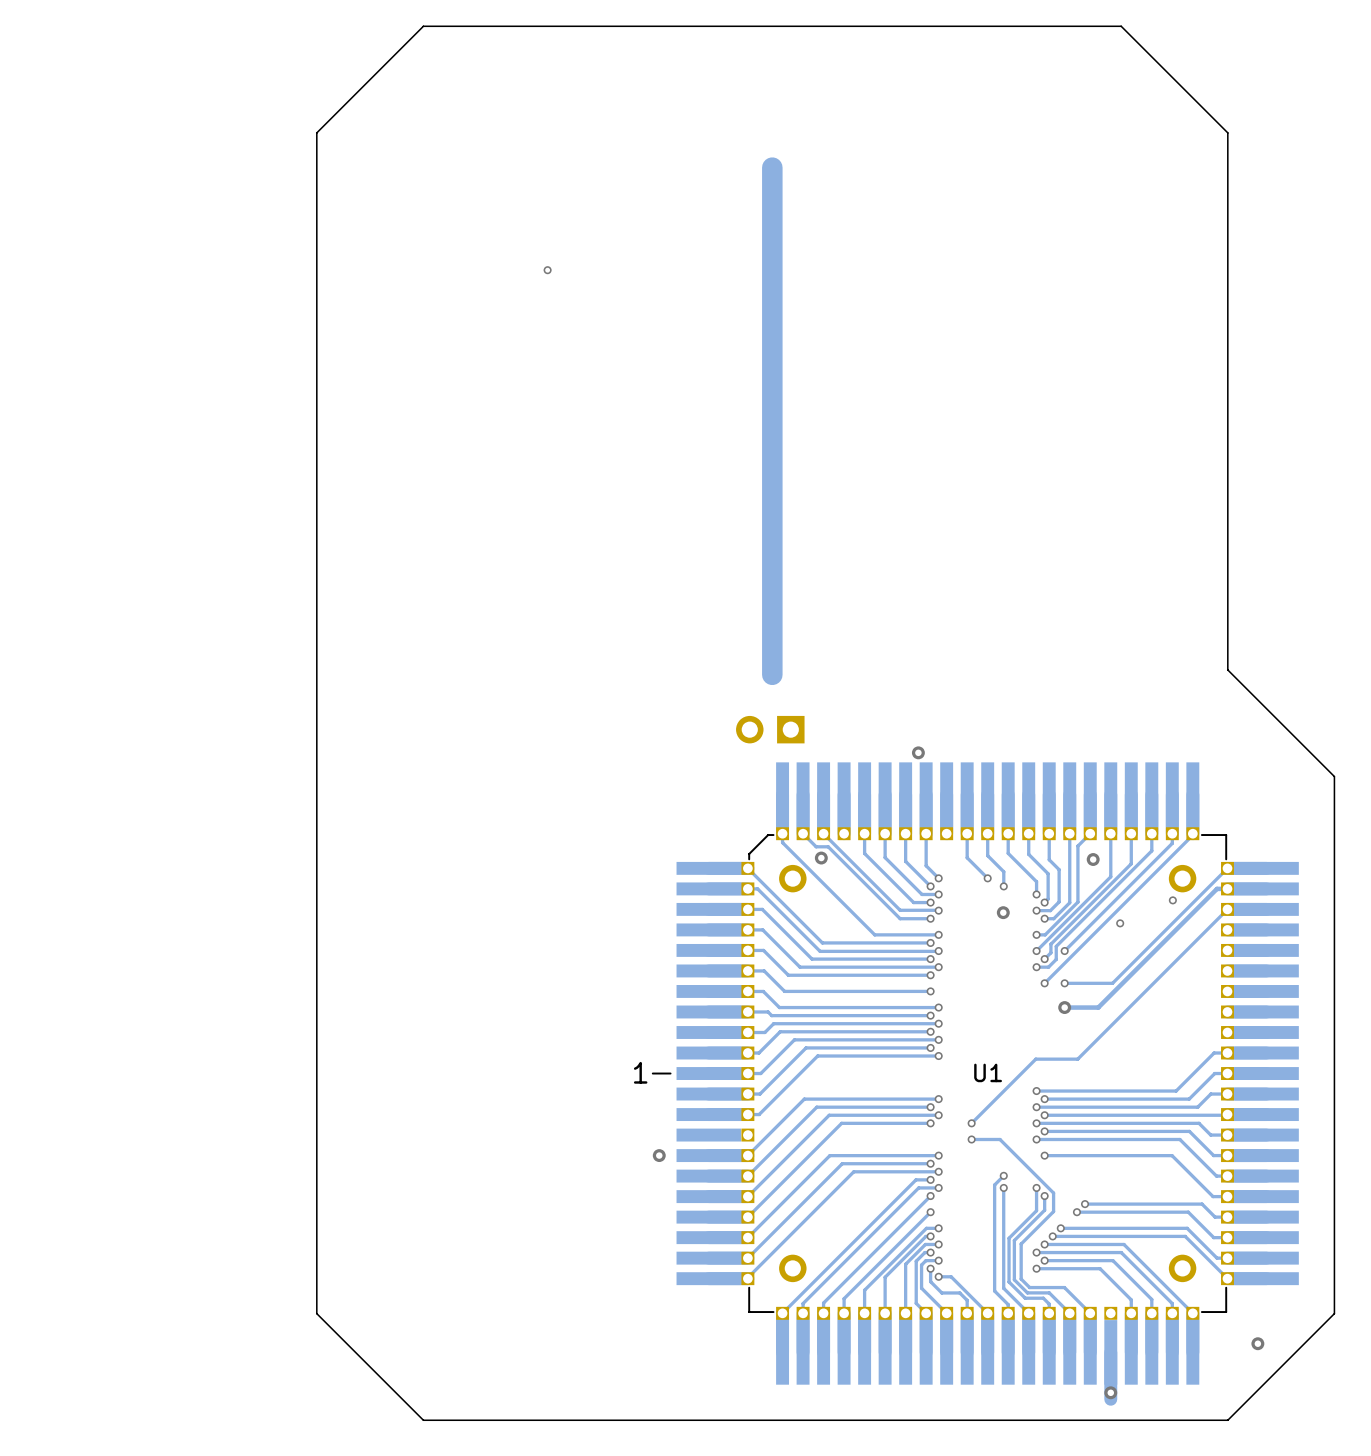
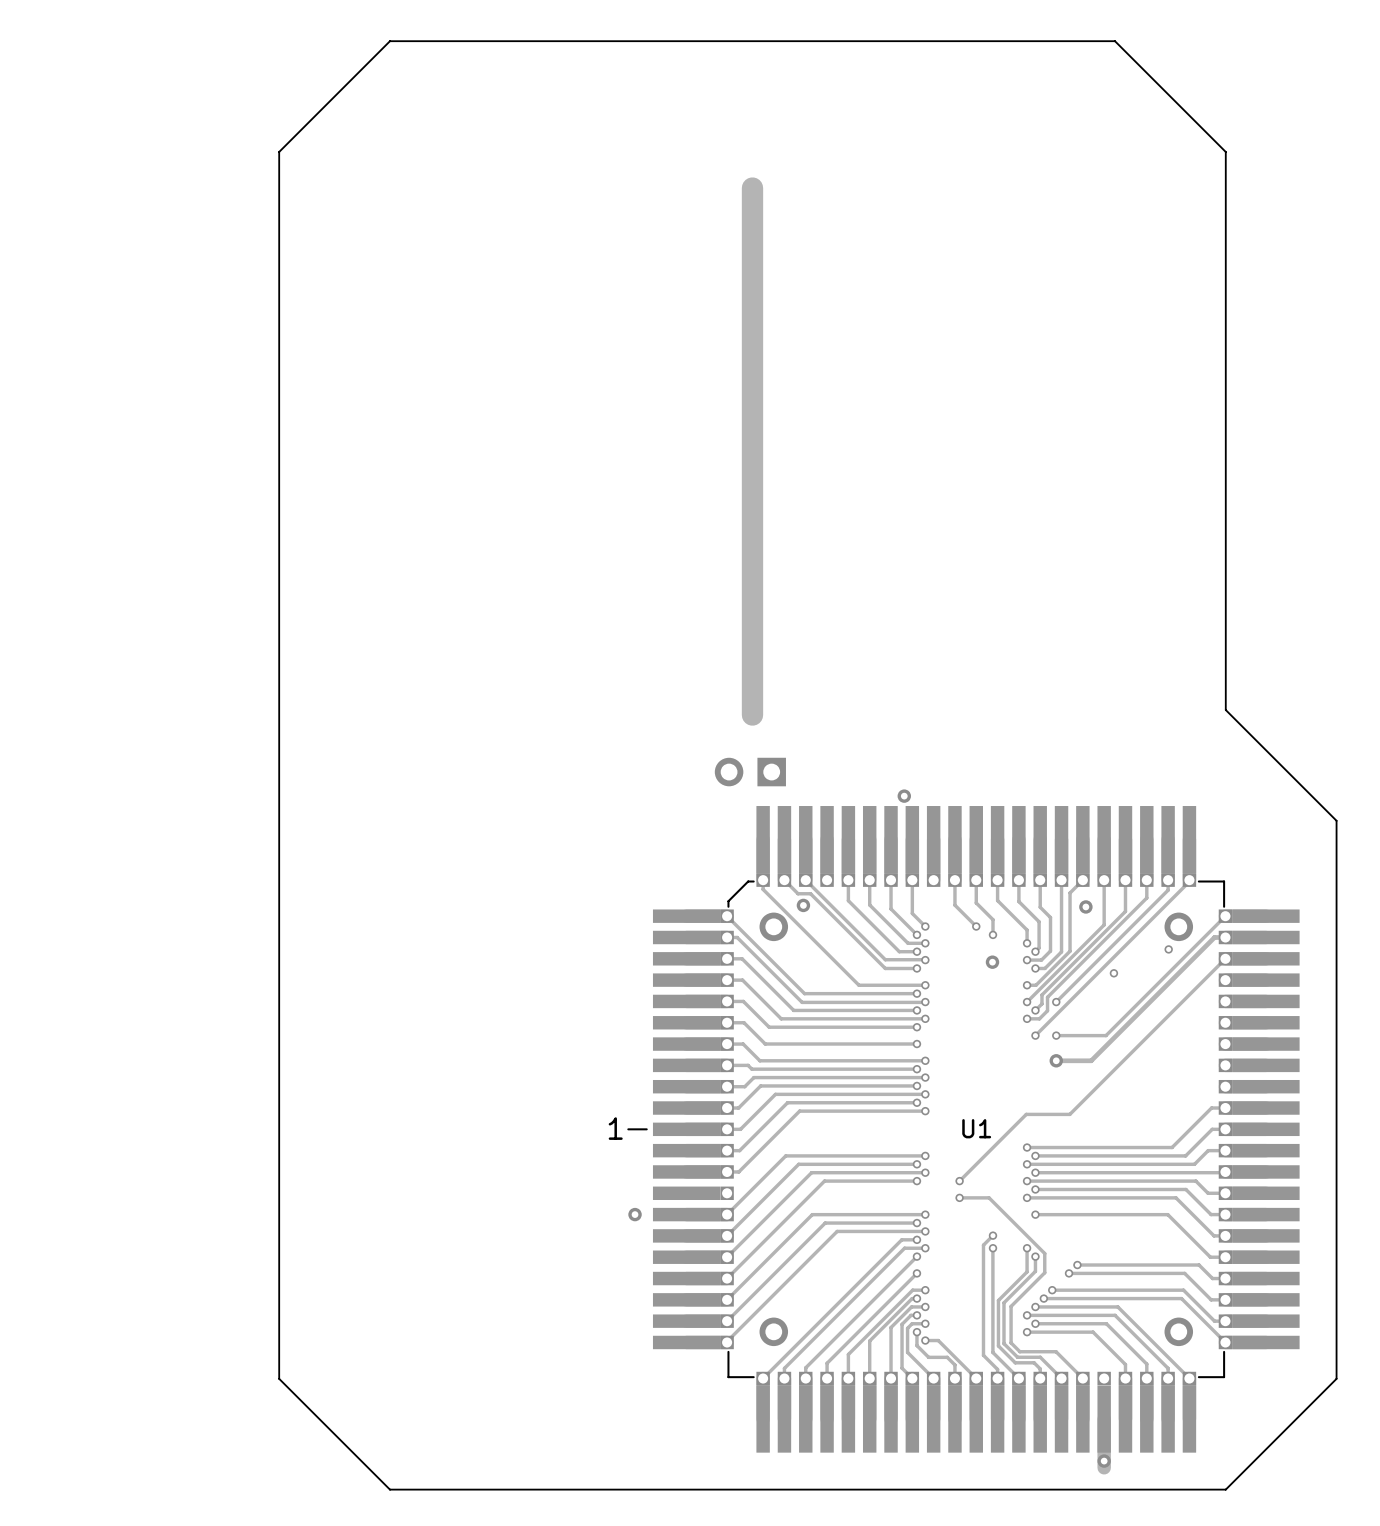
via: (547, 270) -> none
via: (1257, 1343) -> none

